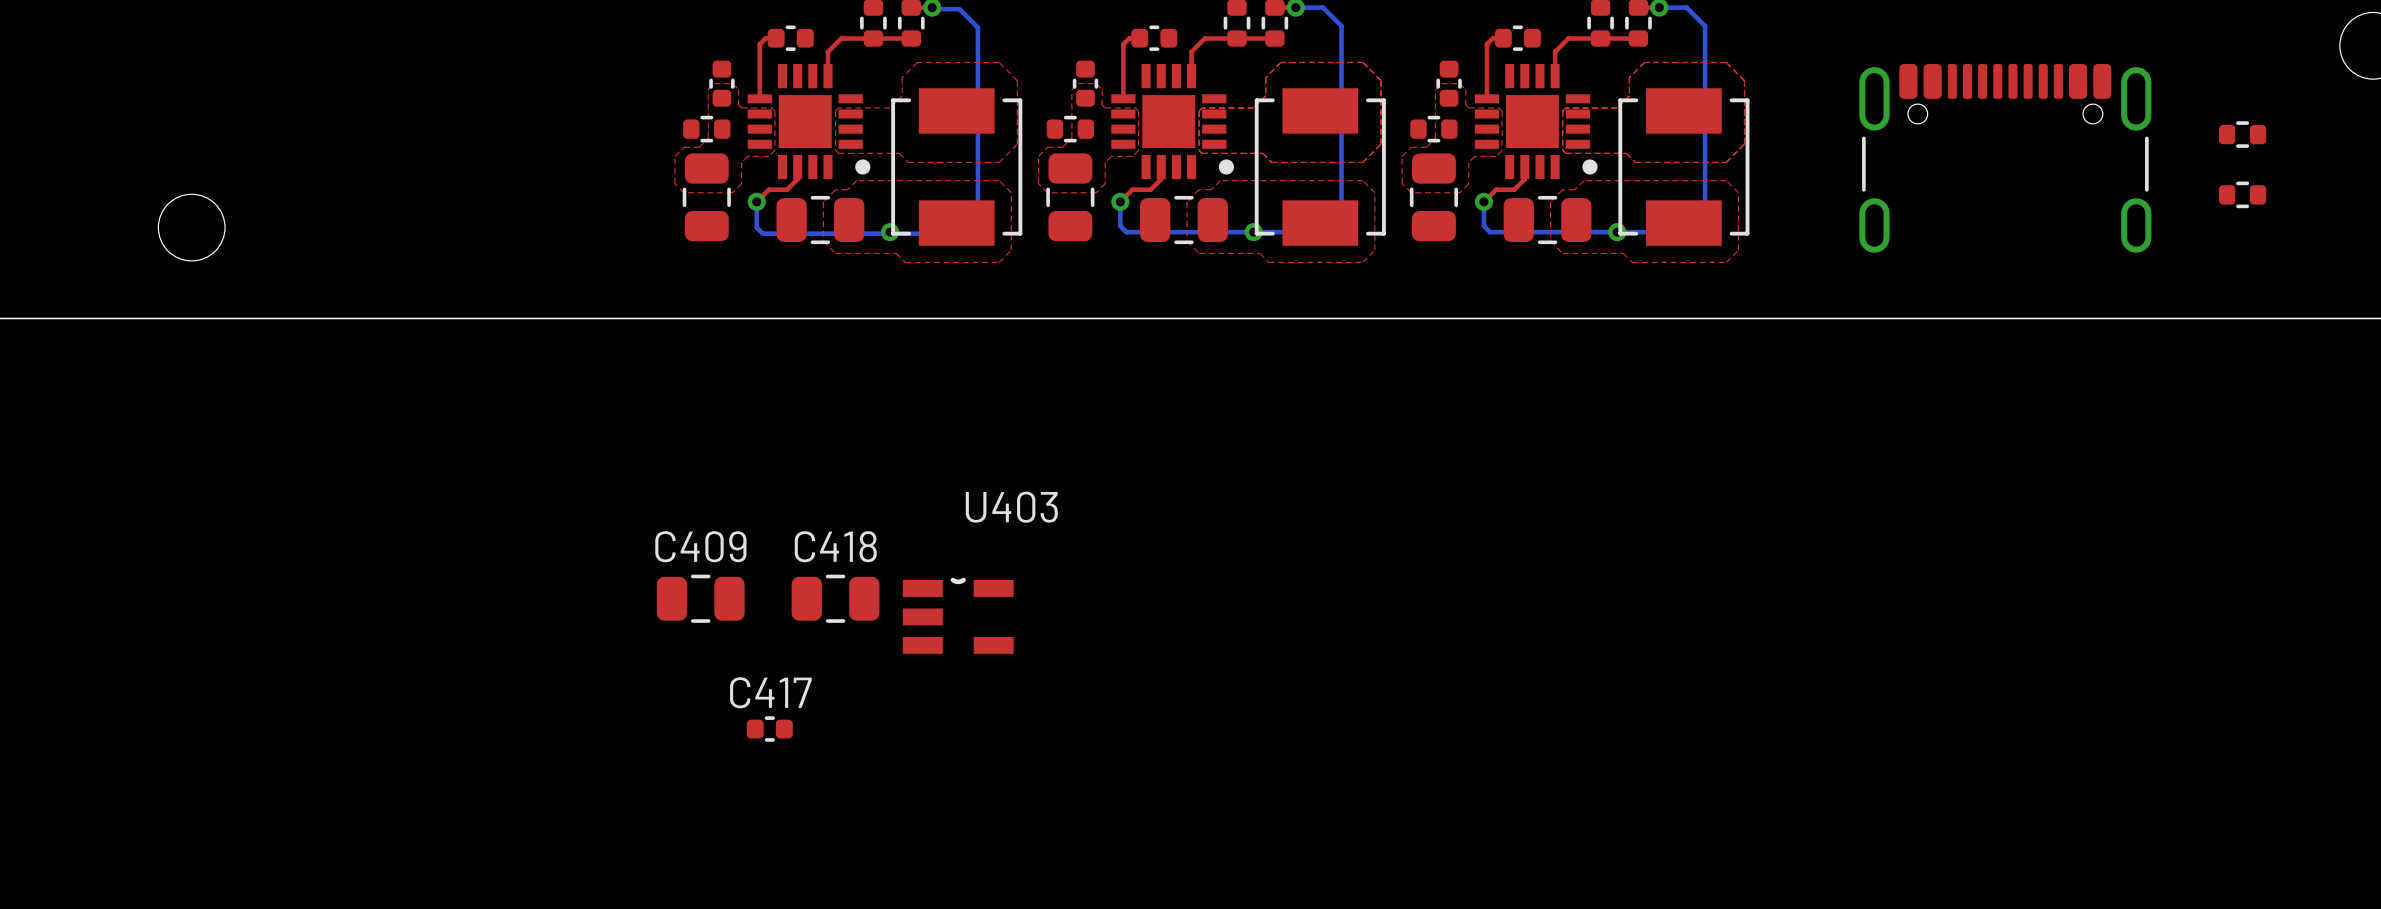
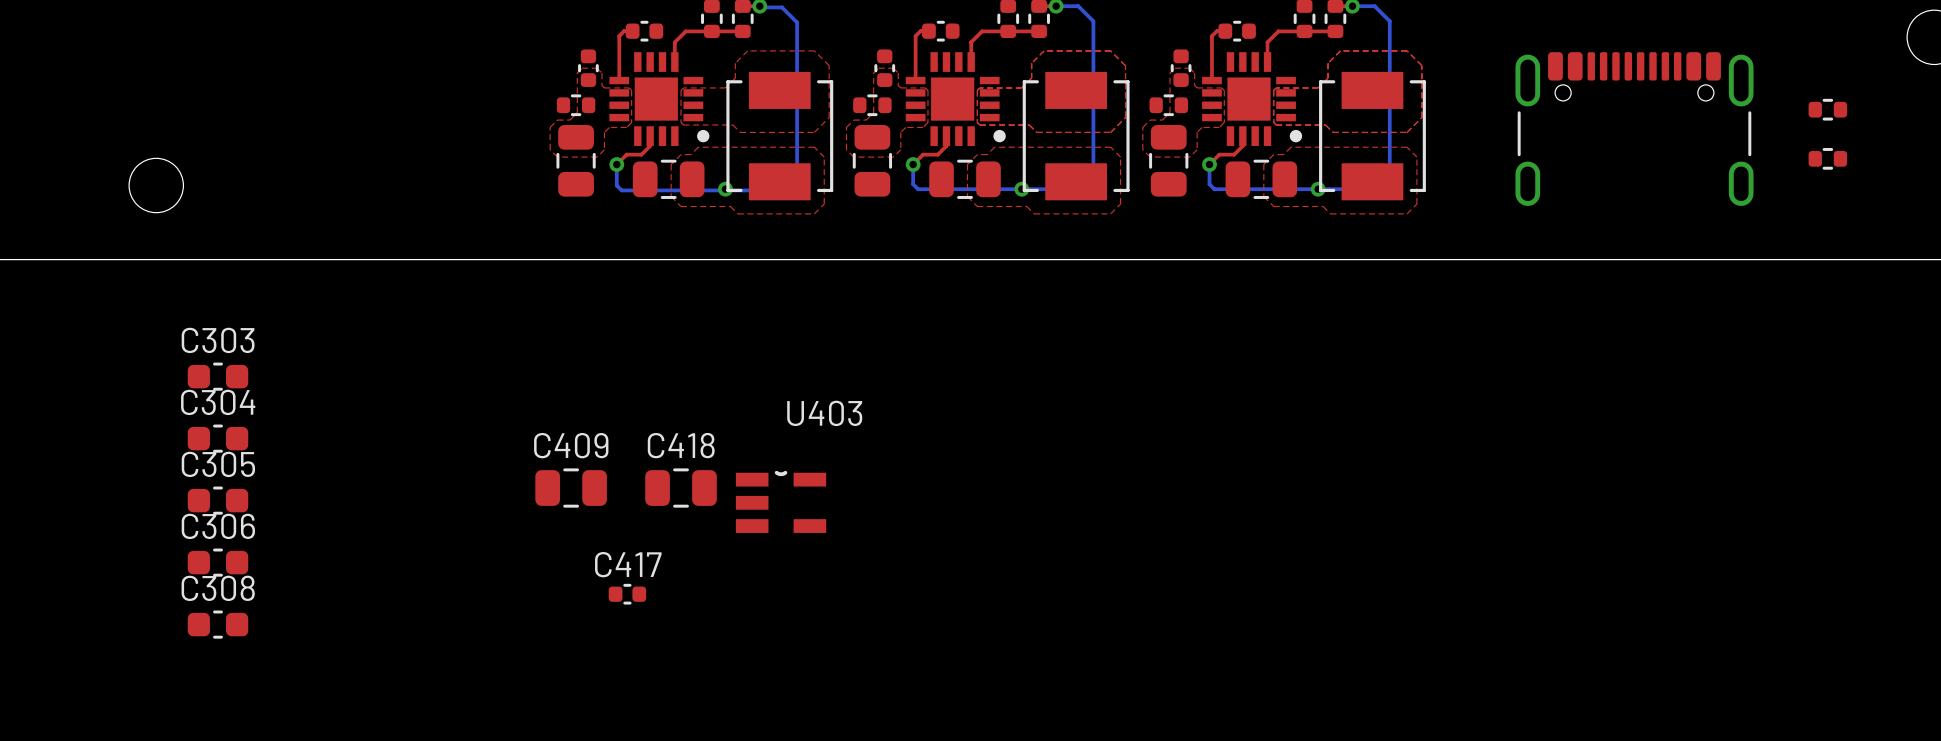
C303: none -> (217, 376)
C304: none -> (217, 438)
C305: none -> (217, 500)
C306: none -> (217, 562)
C308: none -> (217, 624)

